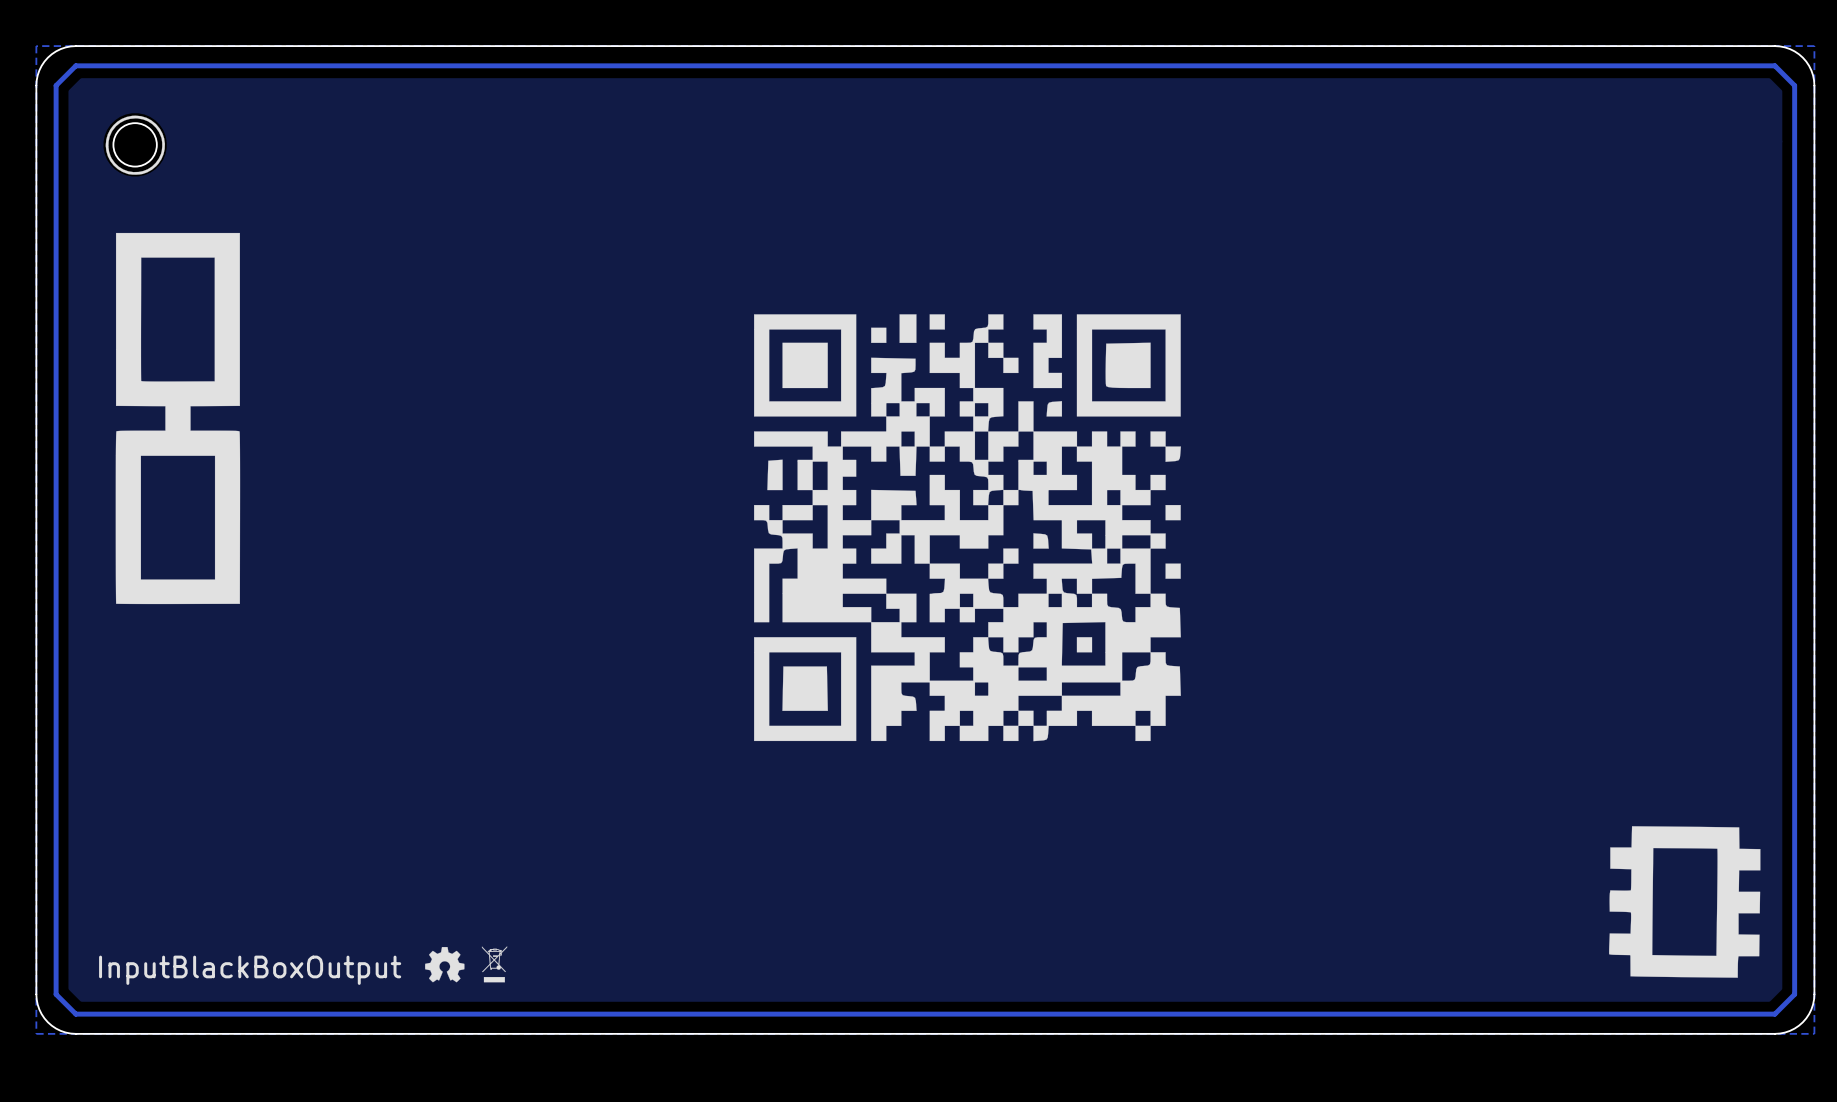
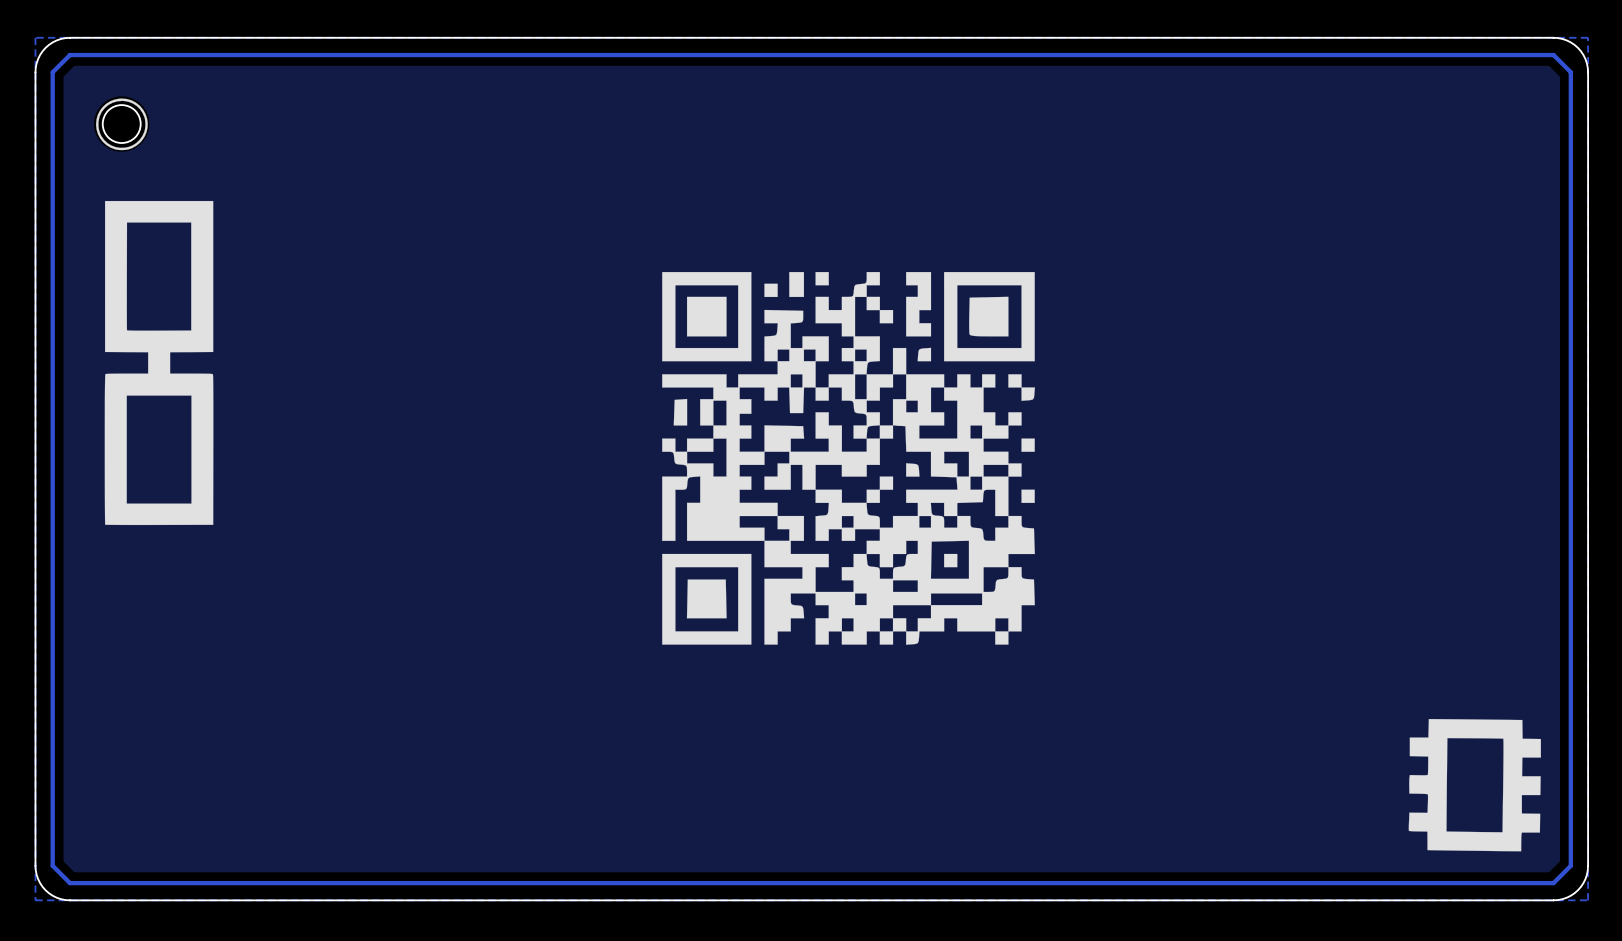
drawing: [425, 946, 508, 983] -> none
text: InputBlackBoxOutput (250, 970) -> none

